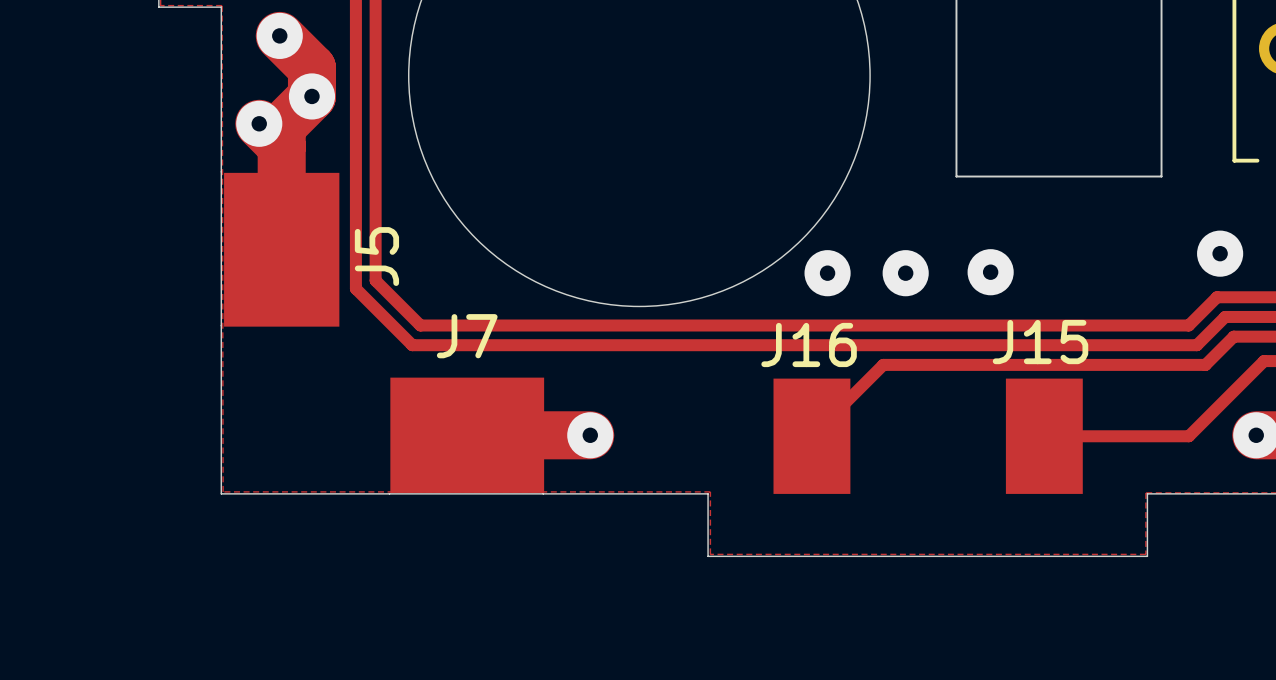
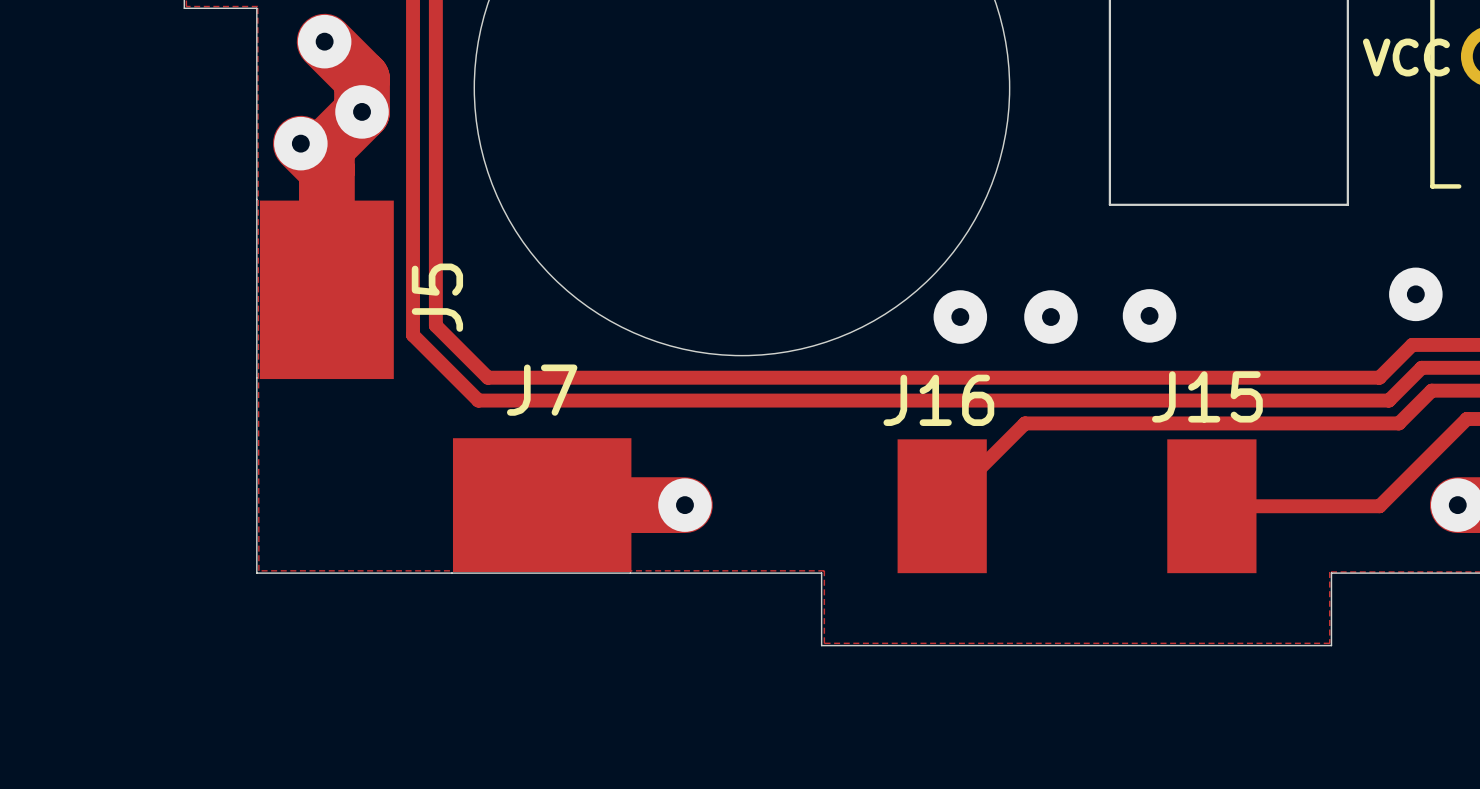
text: none -> VCC (1406, 57)

